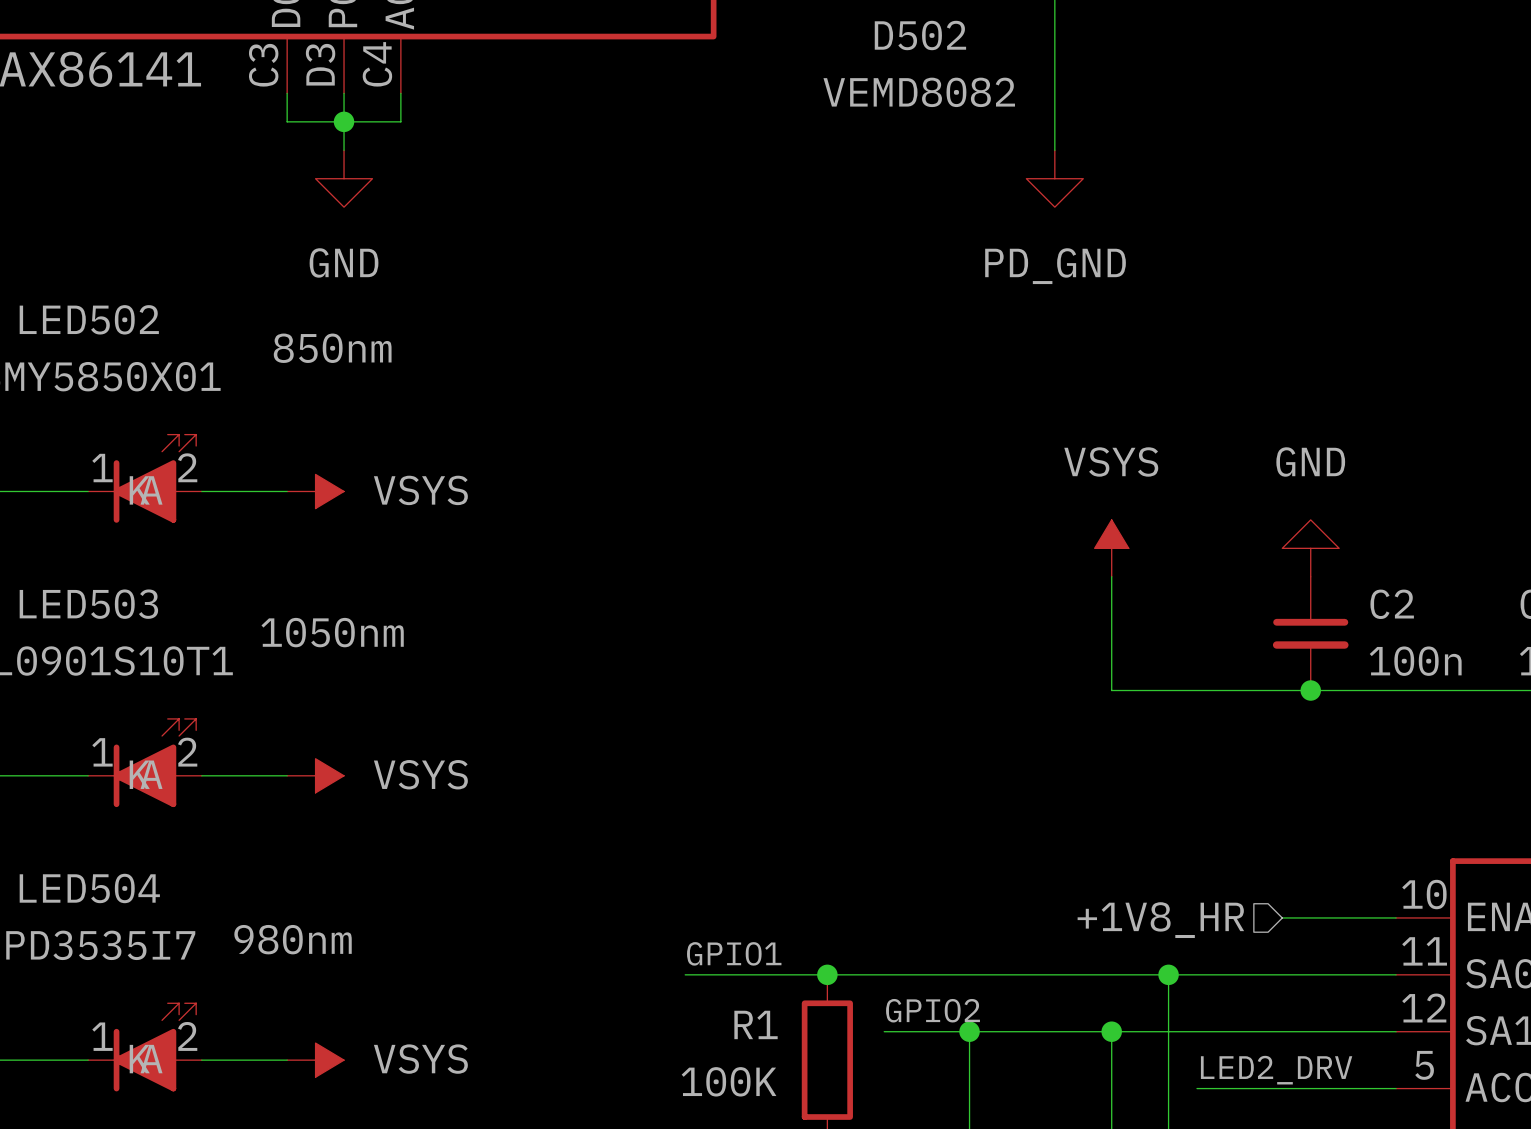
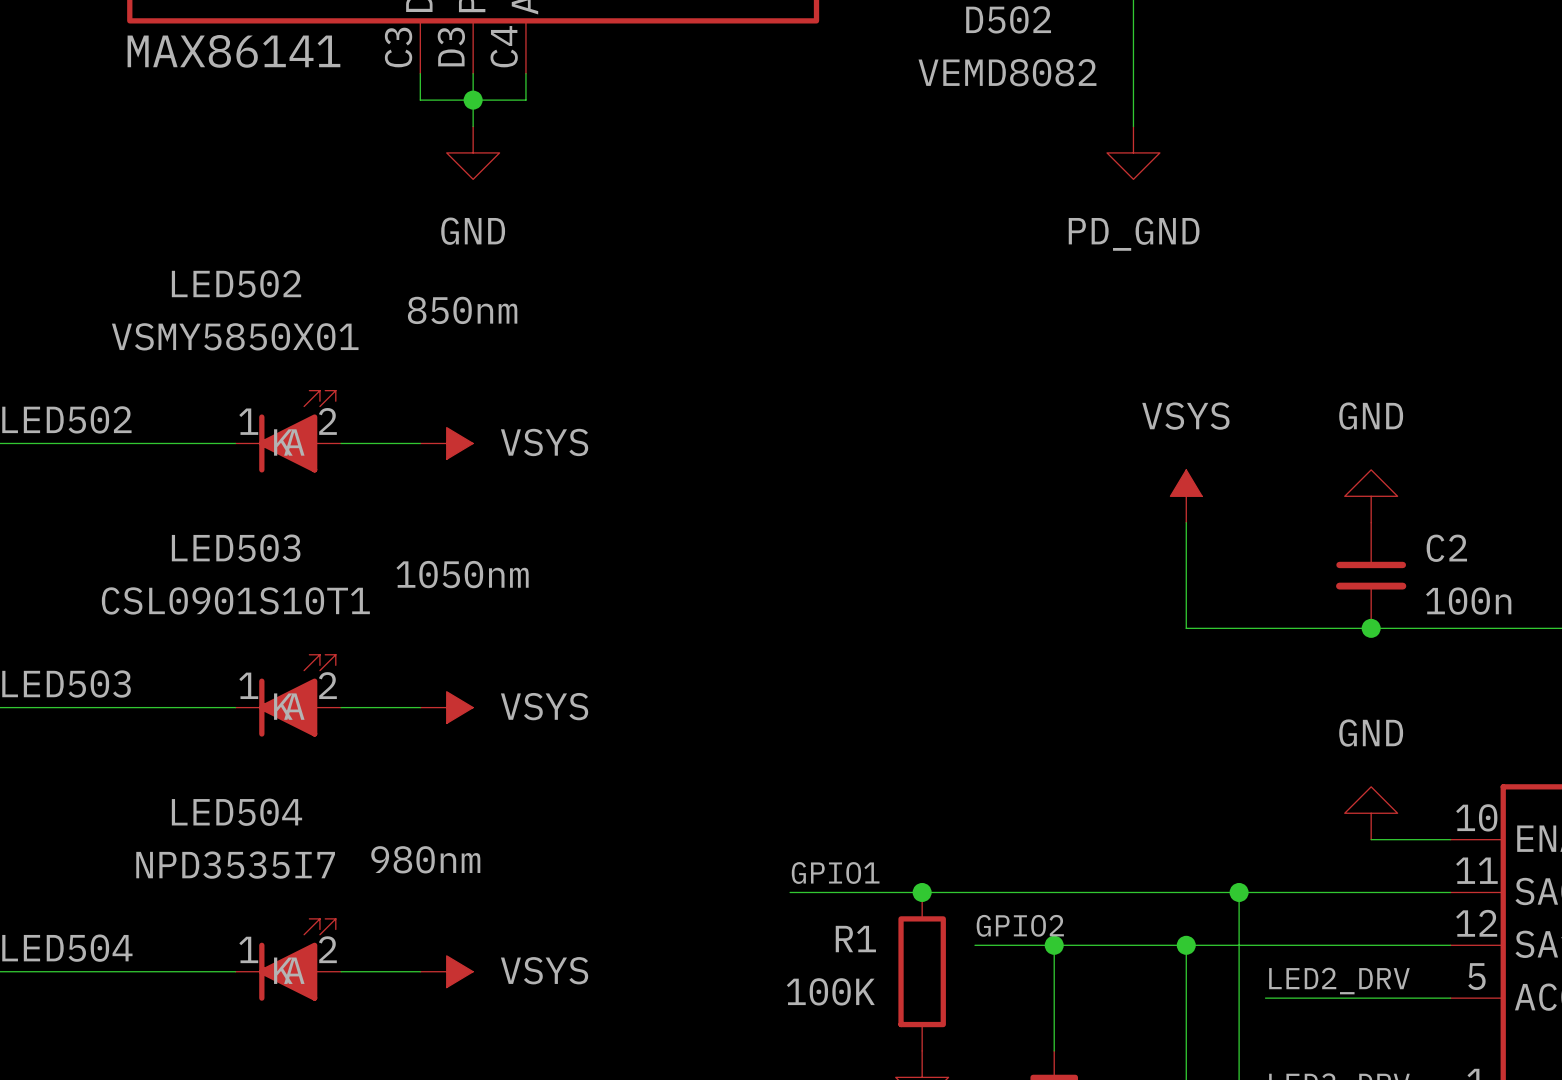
power symbol: none -> GND (1371, 813)
wire: (1282, 917) (1310, 917) -> none
hierarchical label: +1V8_HR (1160, 920) -> none

